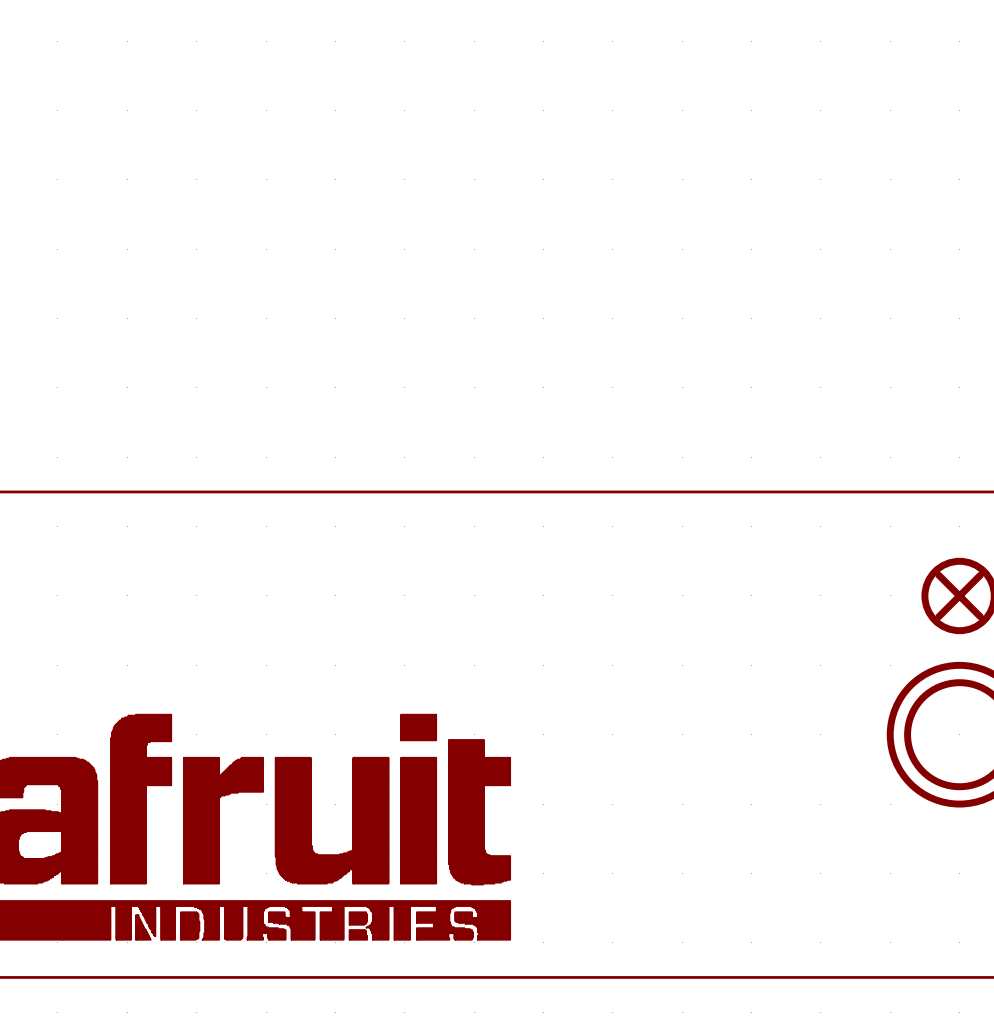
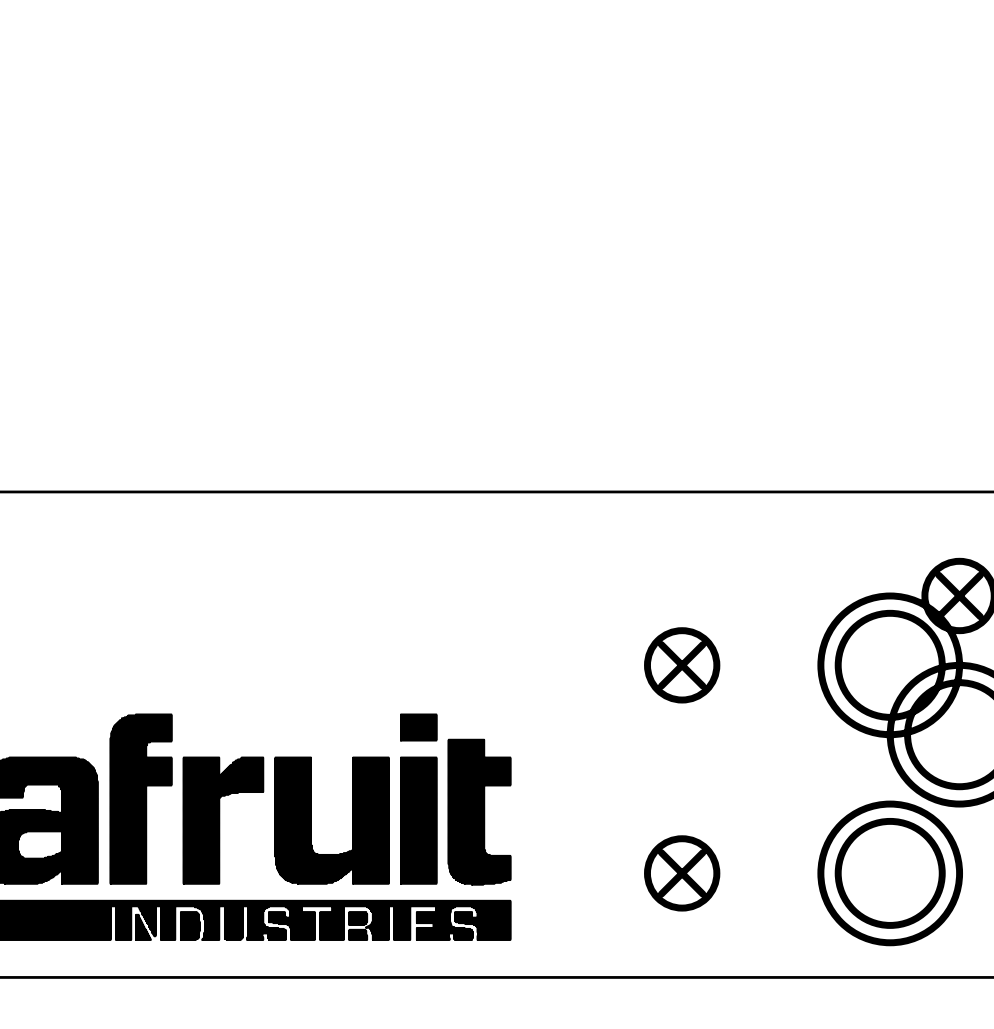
part: none -> (682, 665)
part: none -> (890, 665)
part: none -> (682, 873)
part: none -> (890, 873)

